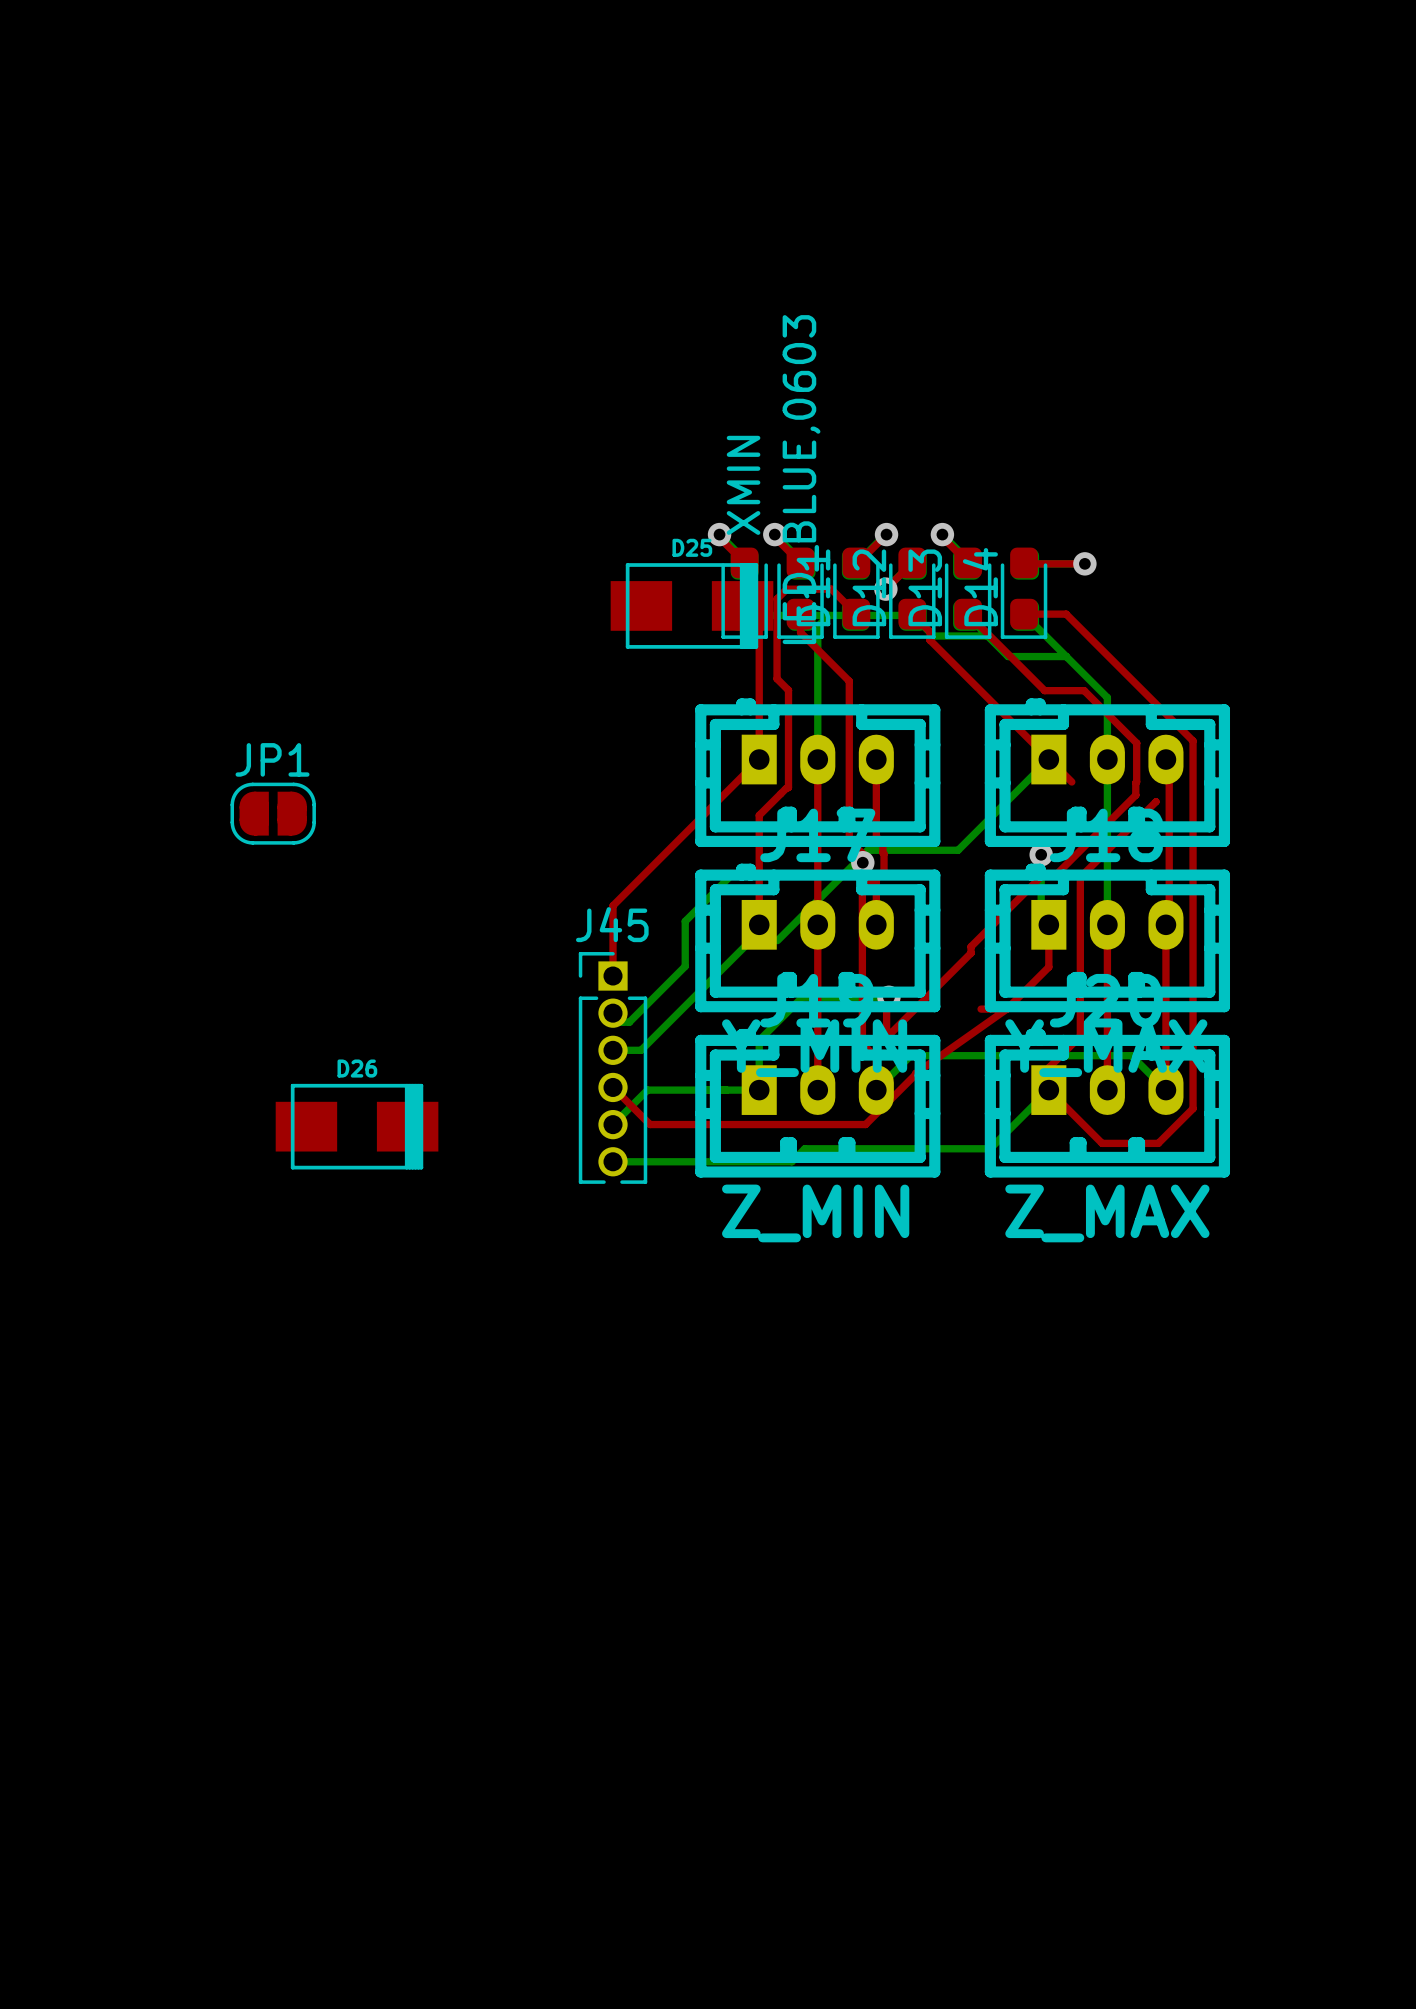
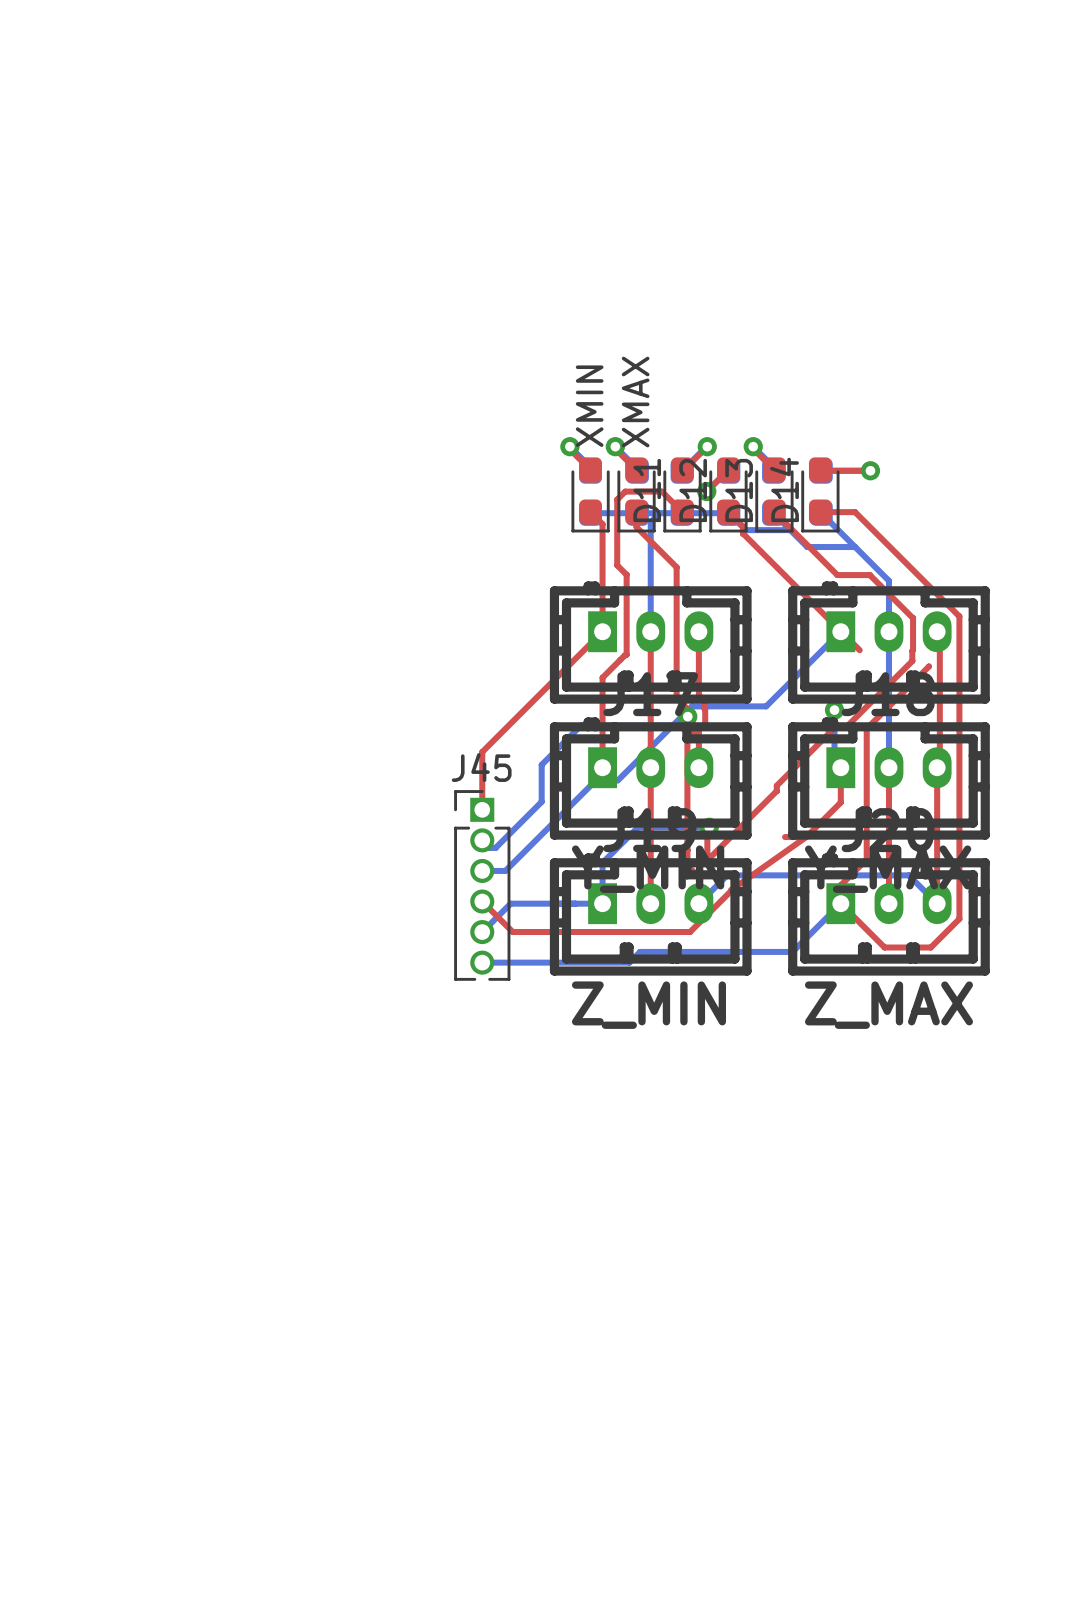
part value: LED_BLUE,0603 (801, 479) -> XMAX (635, 402)
D25: (691, 605) -> none
JP1: (273, 813) -> none
D26: (357, 1126) -> none

